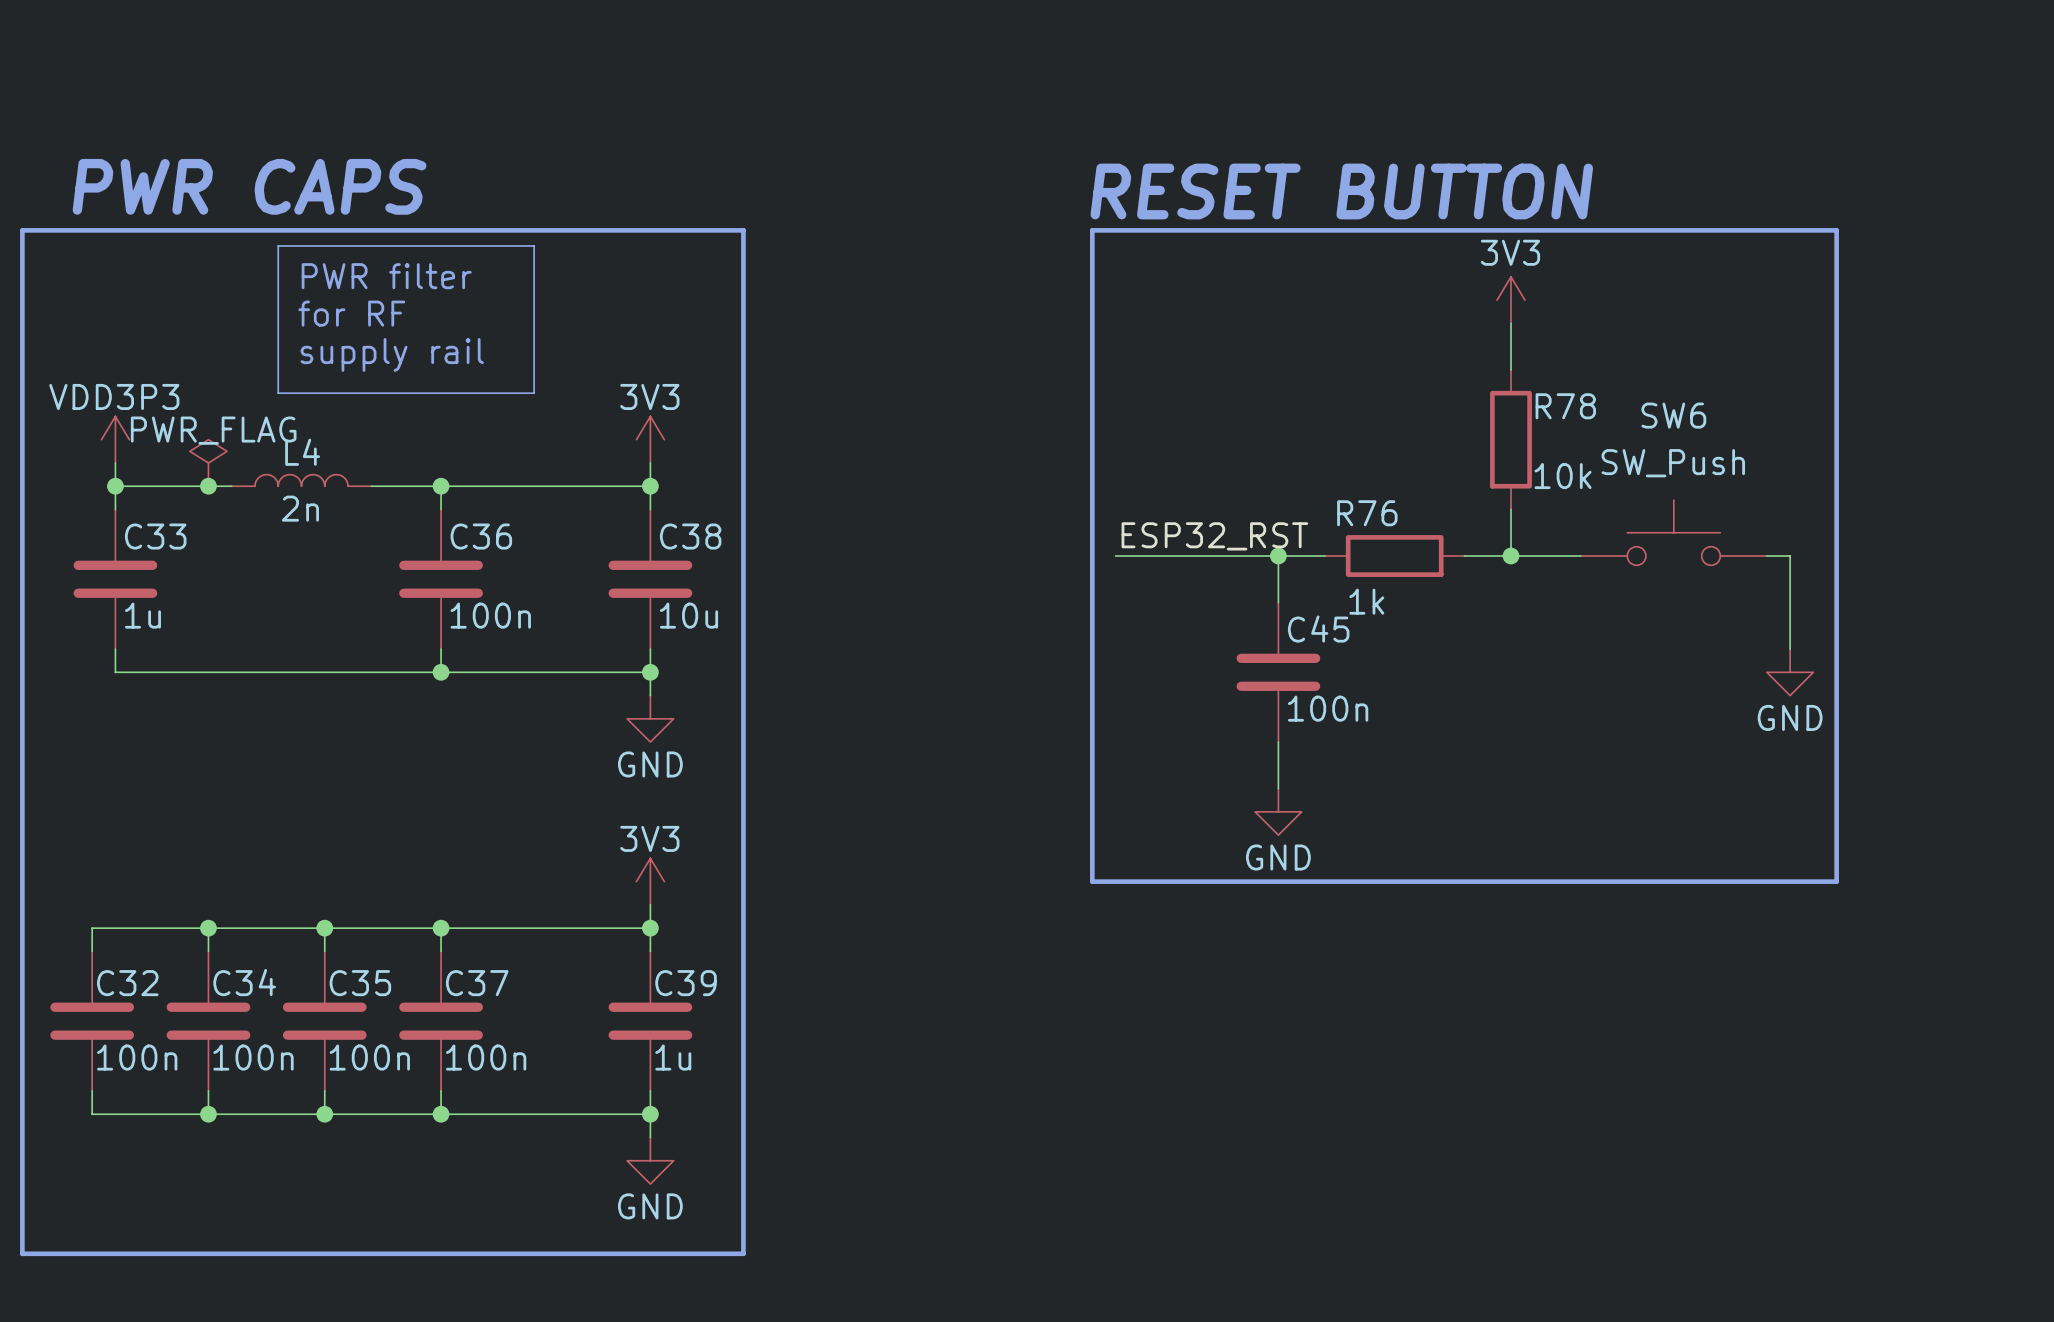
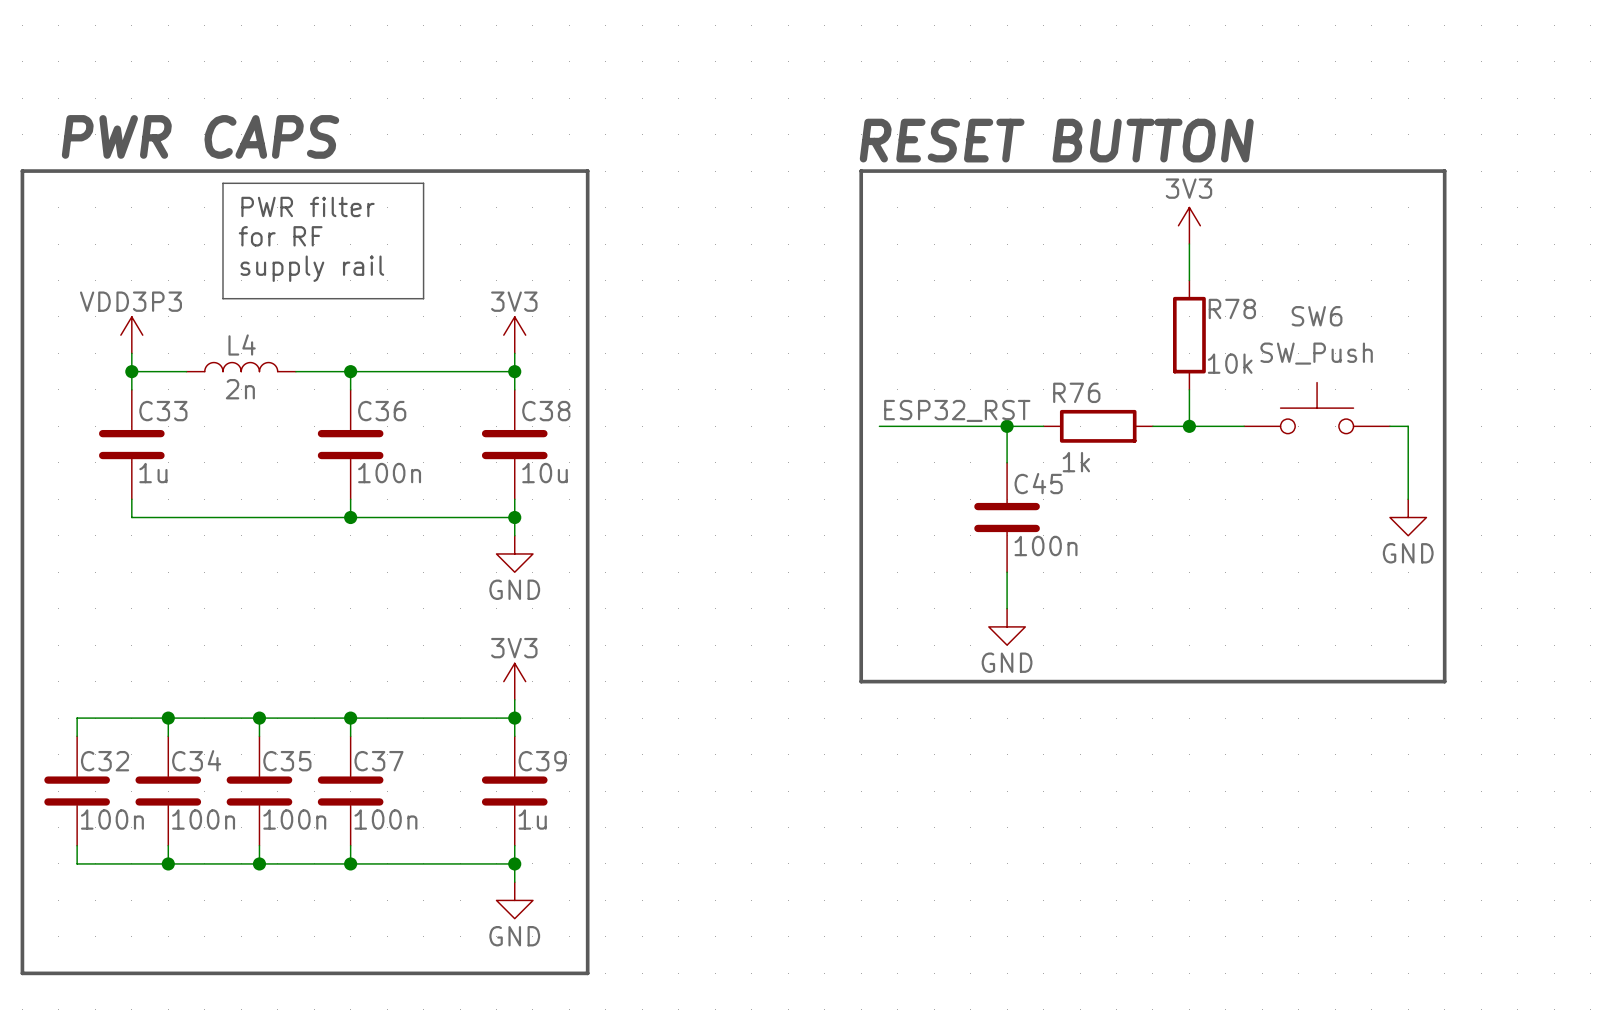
power symbol position: VDD3P3 (115, 439) -> VDD3P3 (131, 335)
wire: (115, 462) (115, 509) -> (131, 353) (131, 389)
power symbol: PWR_FLAG (208, 462) -> none
wire: (115, 486) (161, 486) -> none
junction: (115, 486) -> none
junction: none -> (131, 371)
junction: (208, 486) -> none
C33 position: (115, 579) -> (131, 444)
wire: (115, 649) (115, 672) (161, 672) -> (131, 499) (131, 517)

